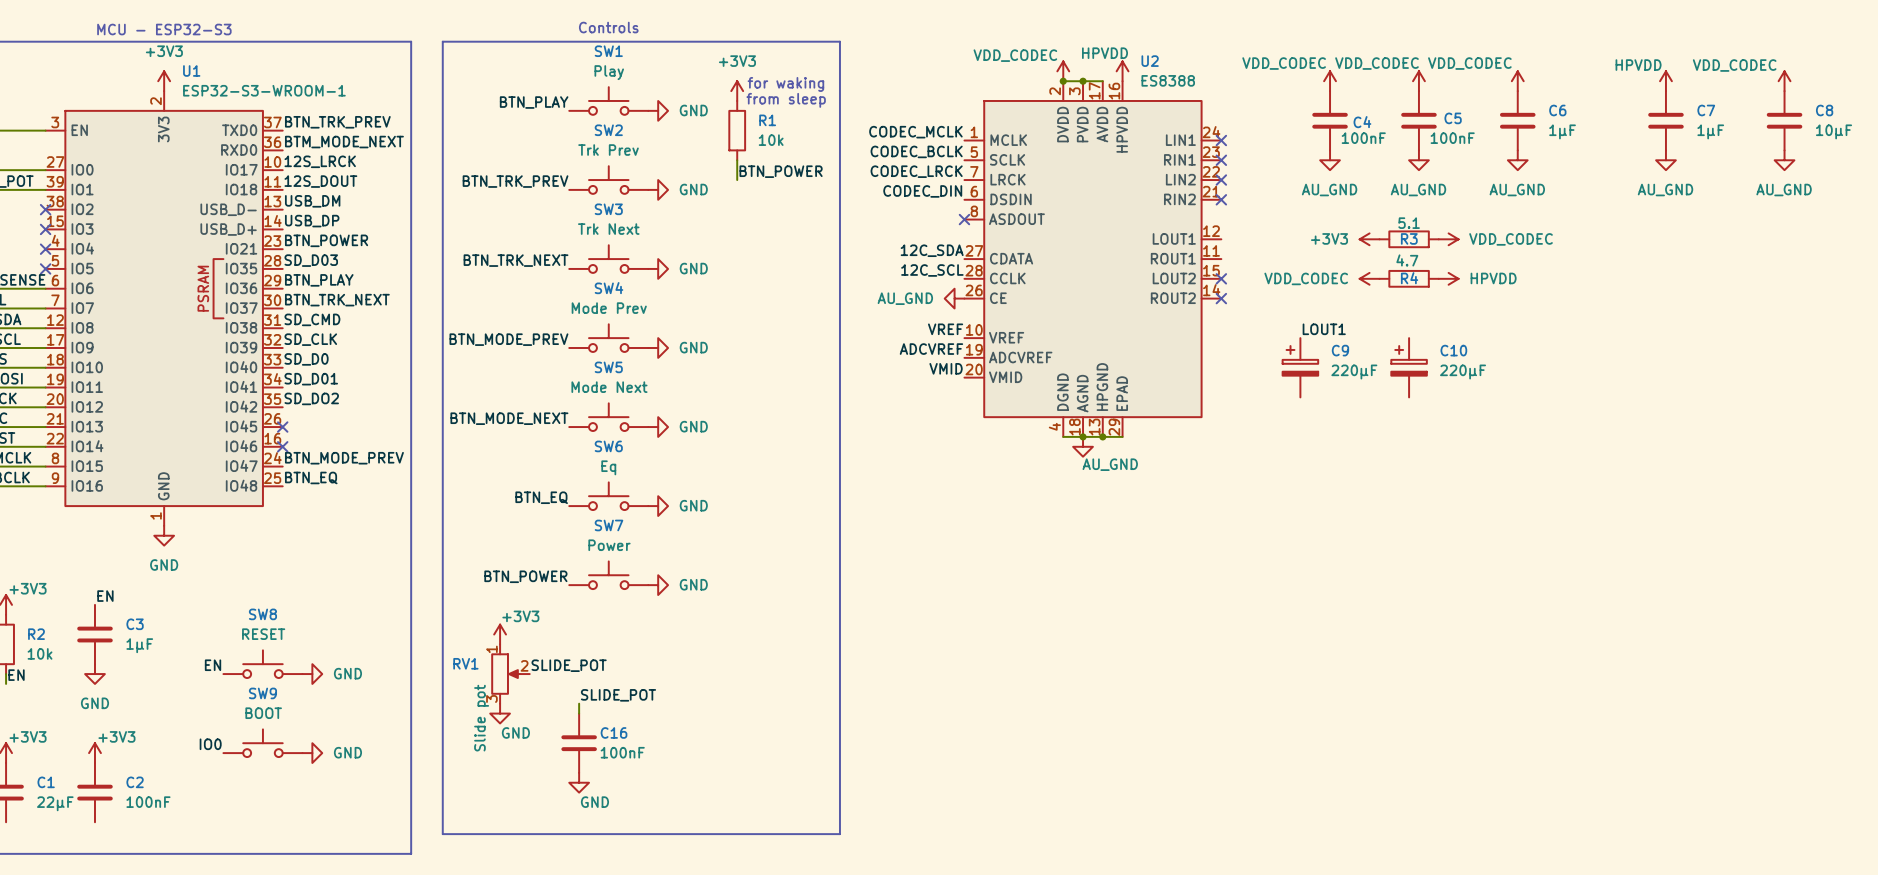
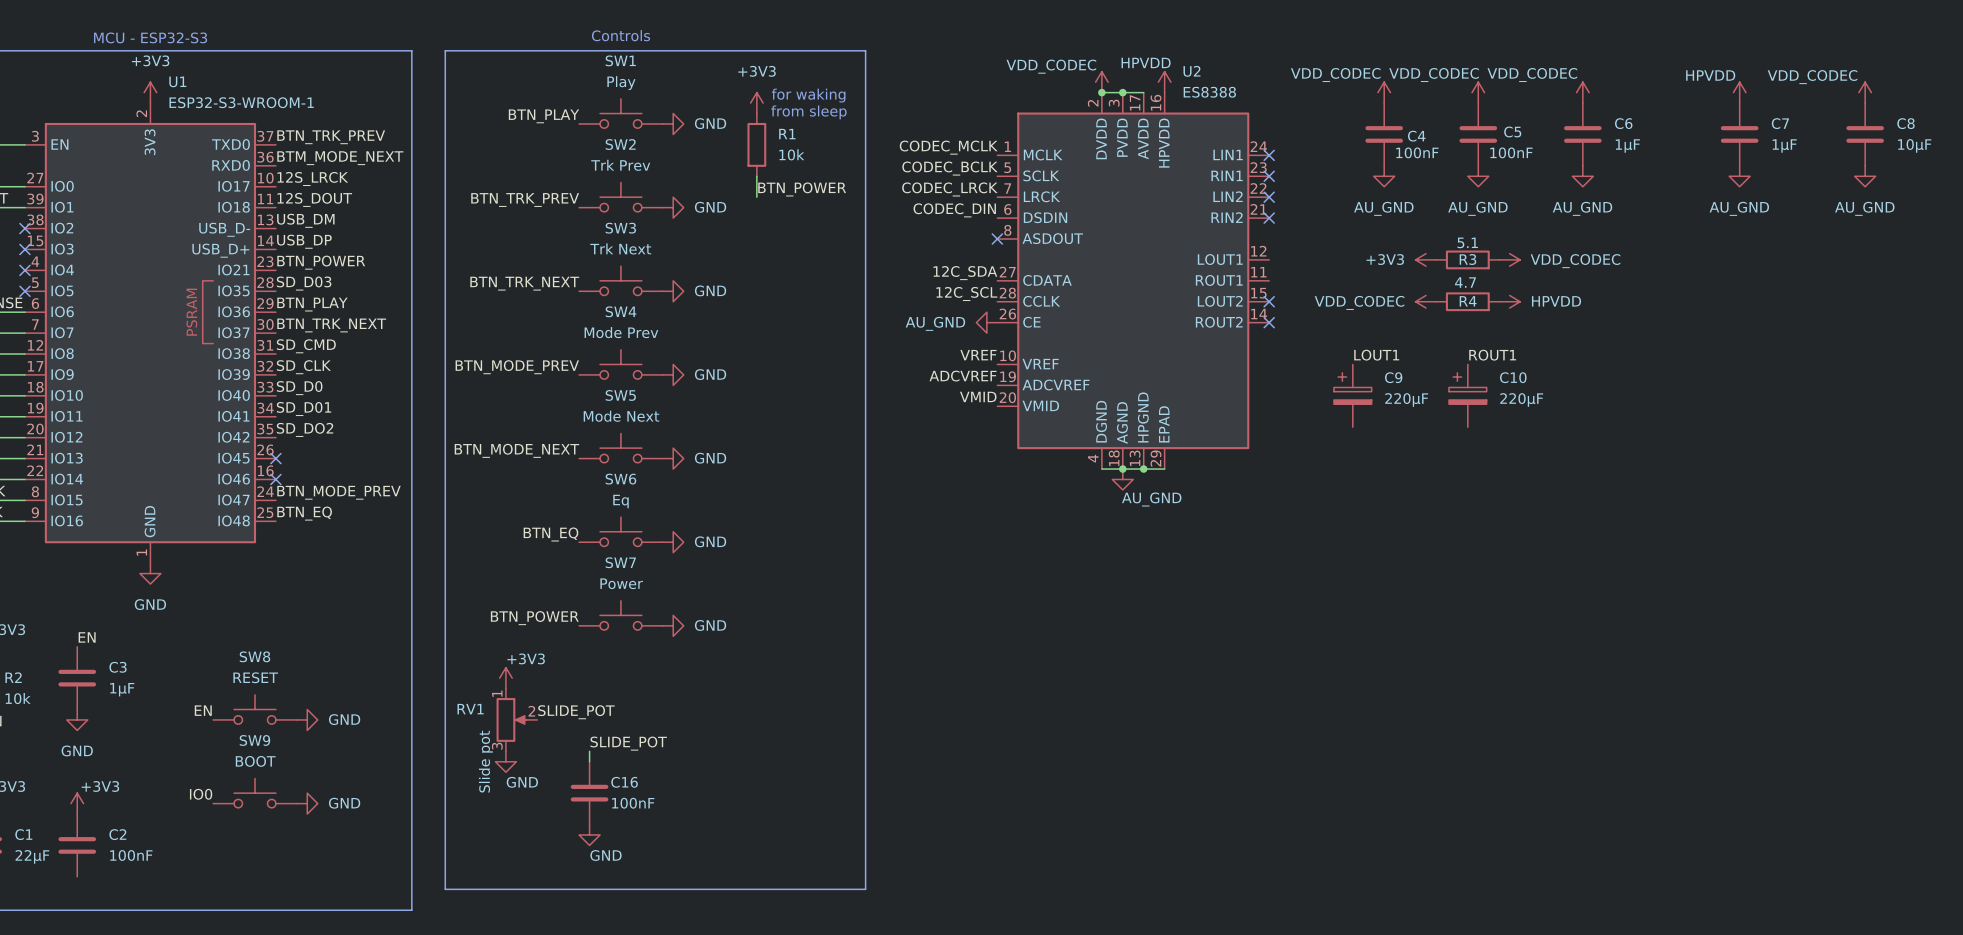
label: none -> ROUT1 (1492, 355)

